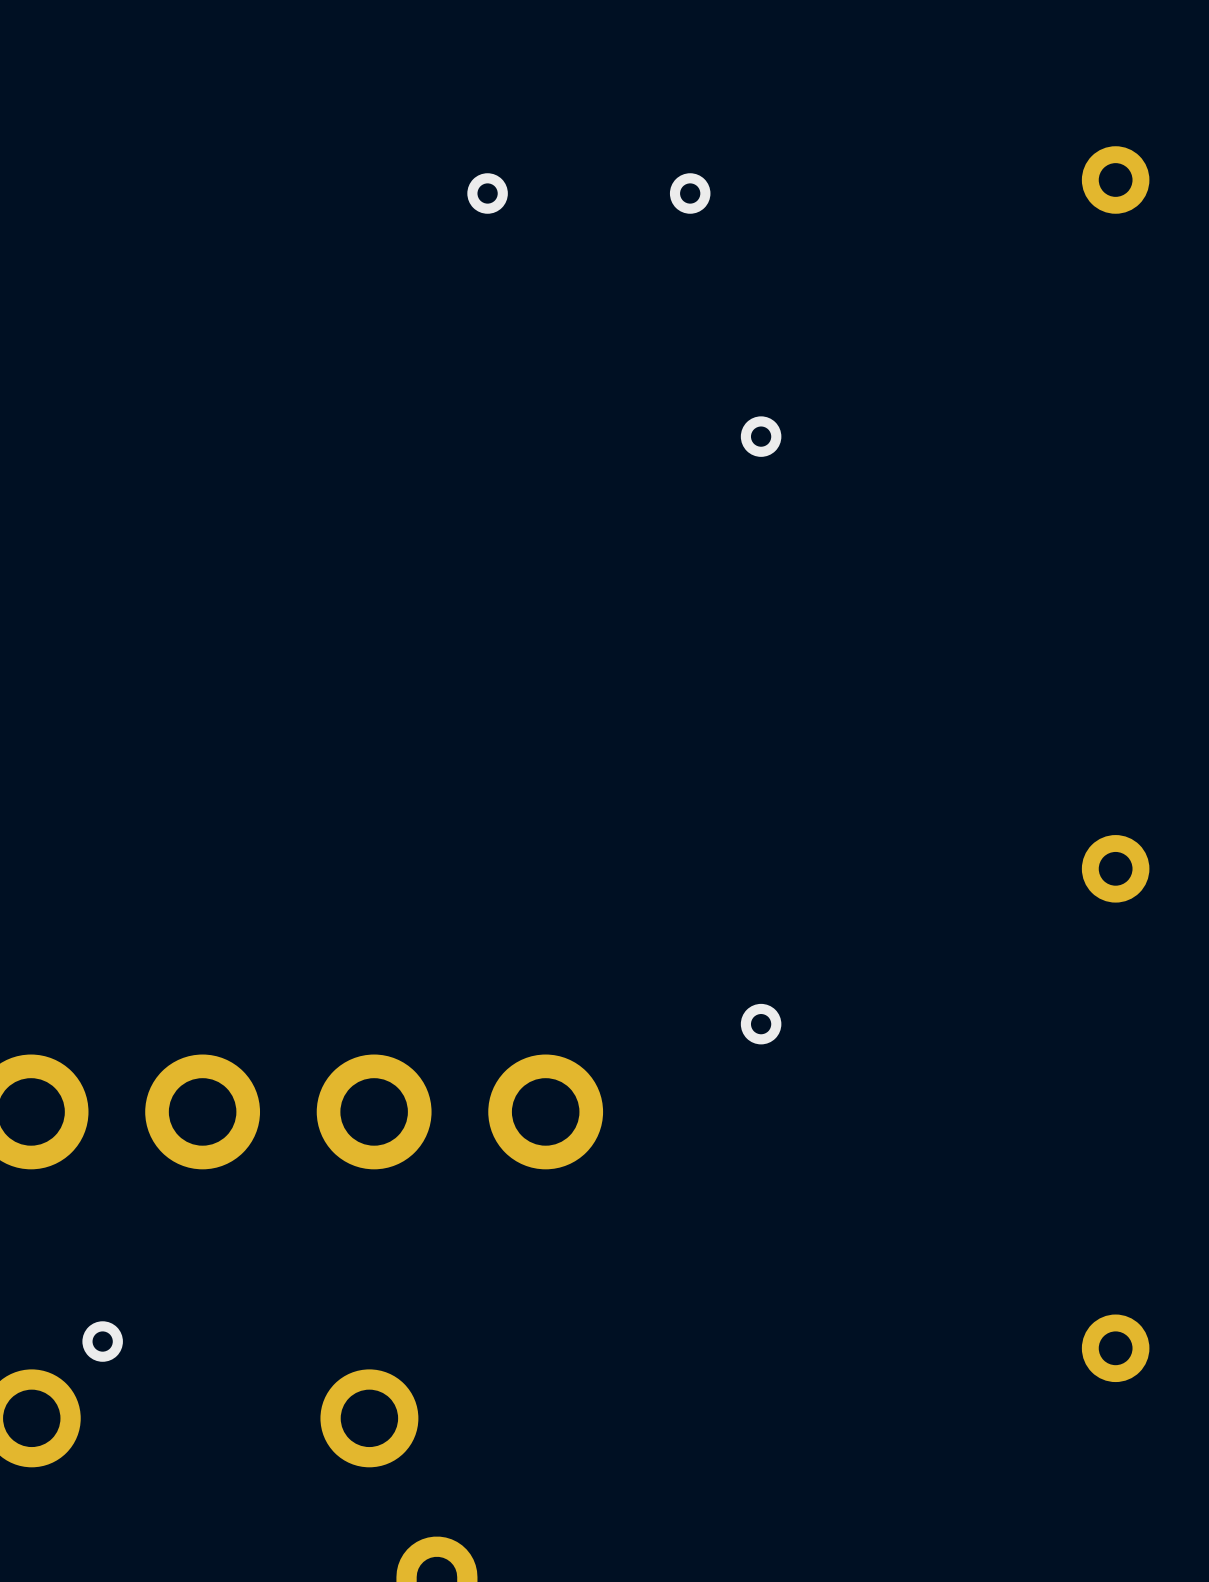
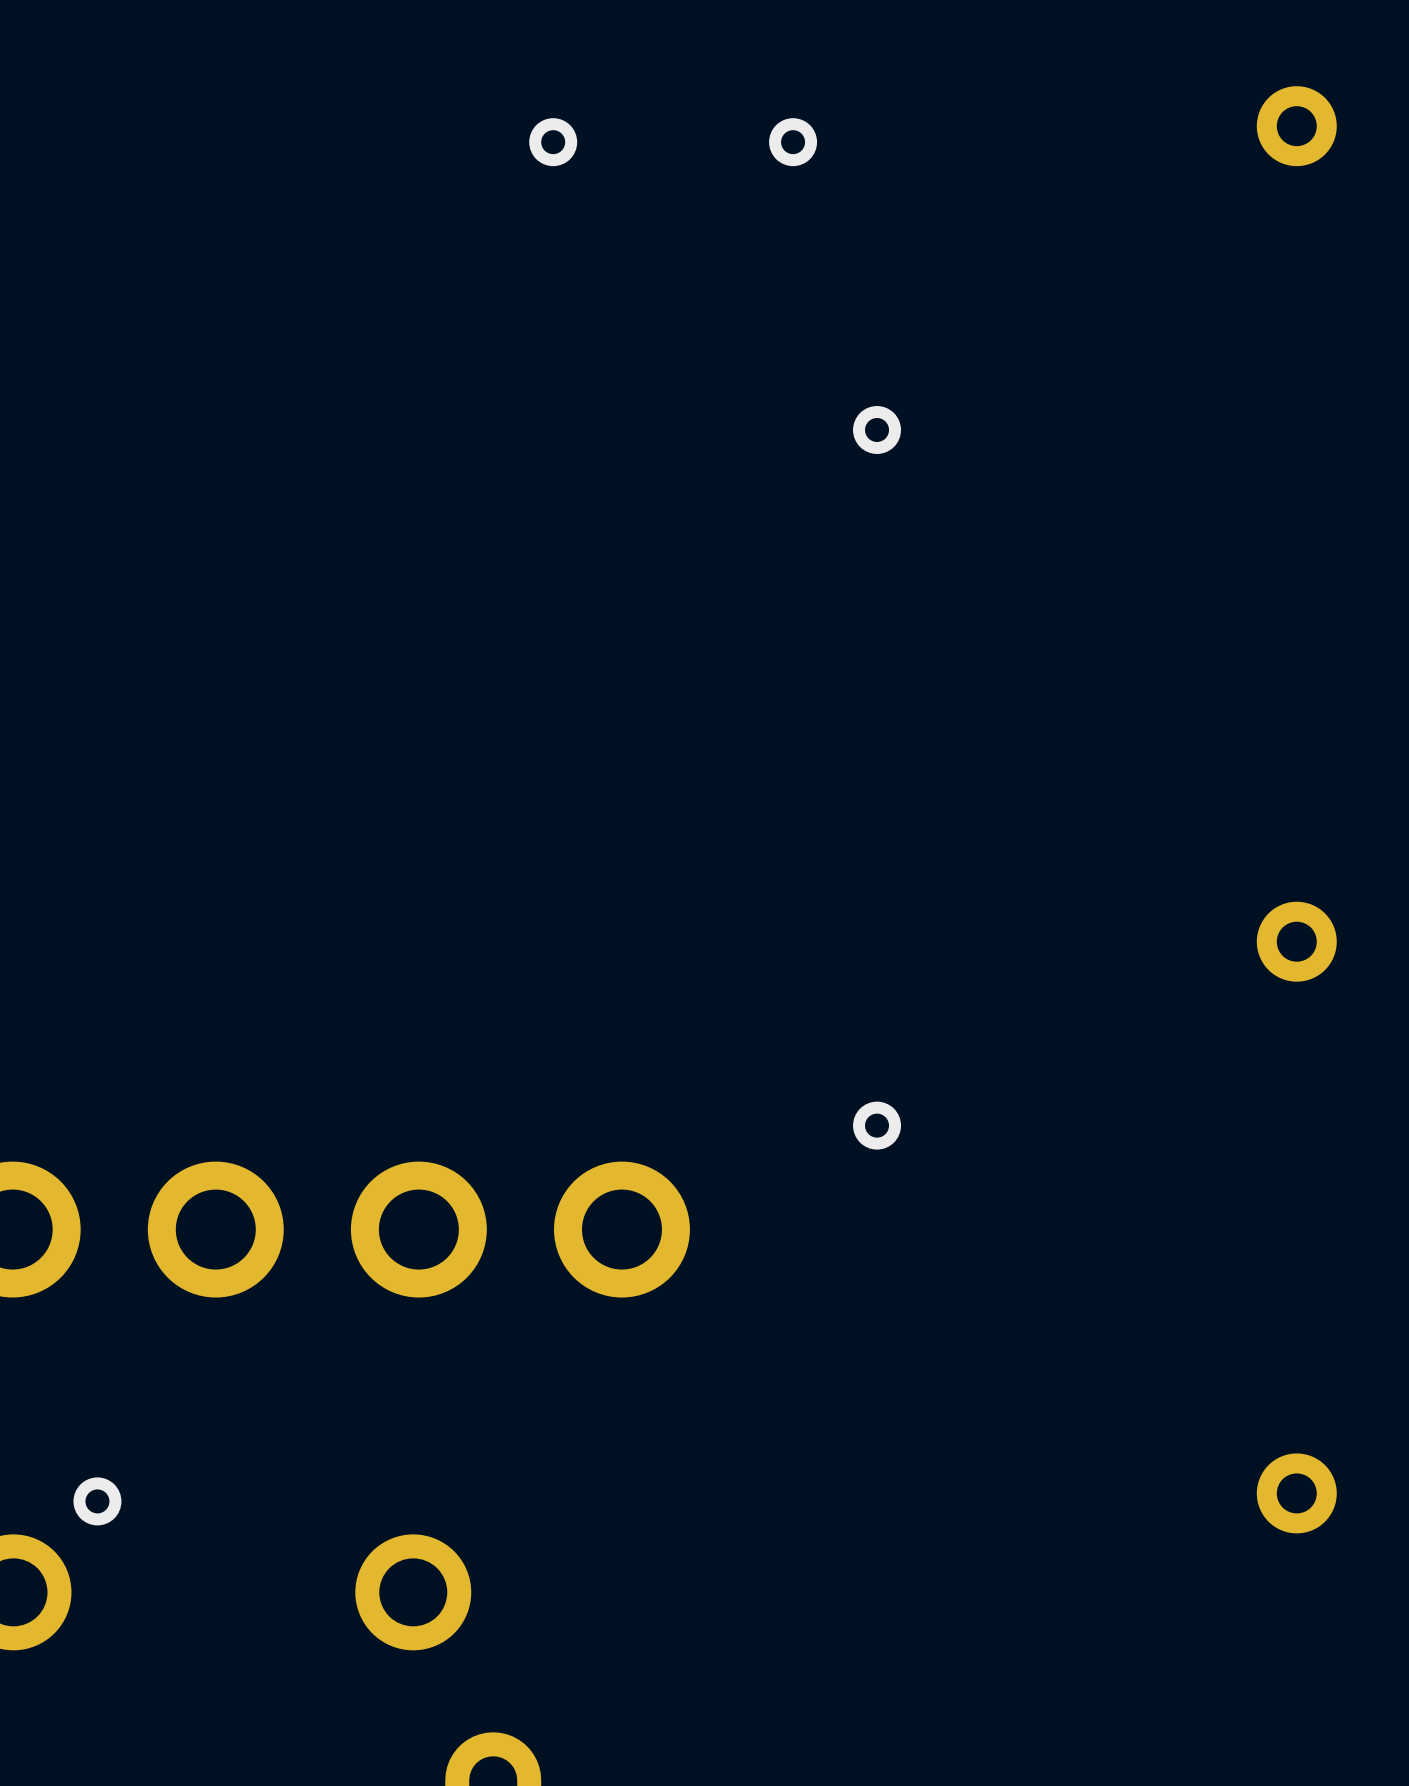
part position: (1115, 1348) -> (1296, 1493)

